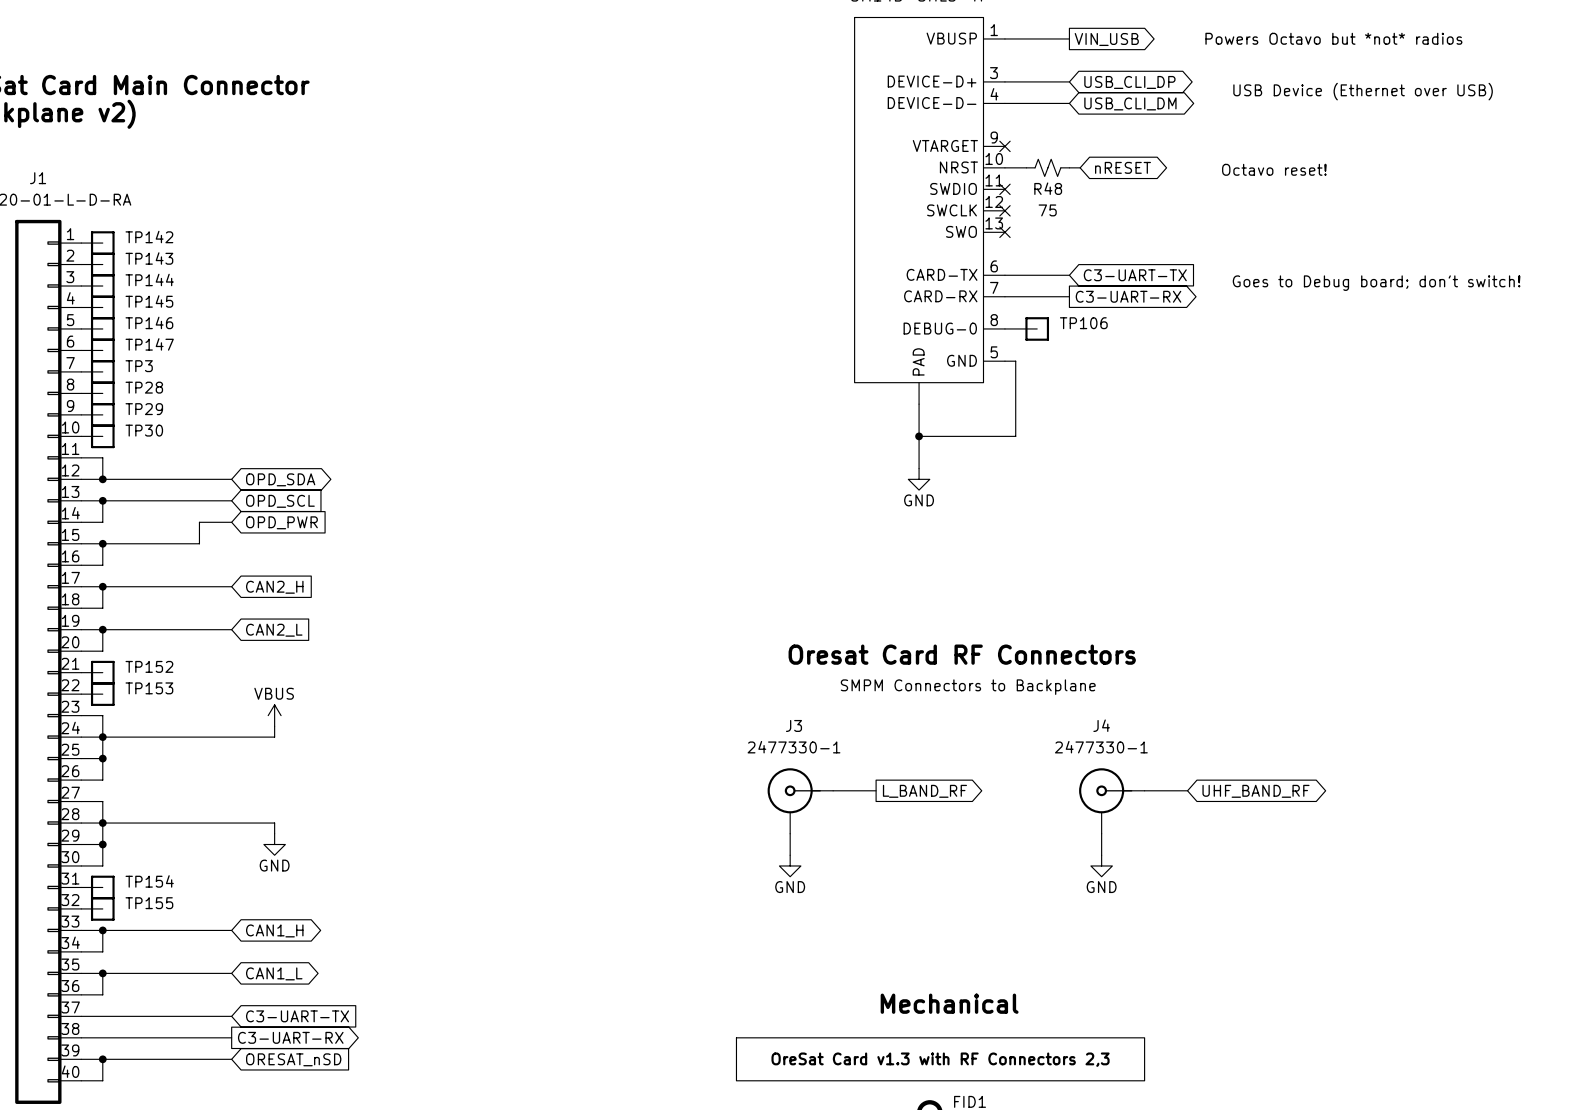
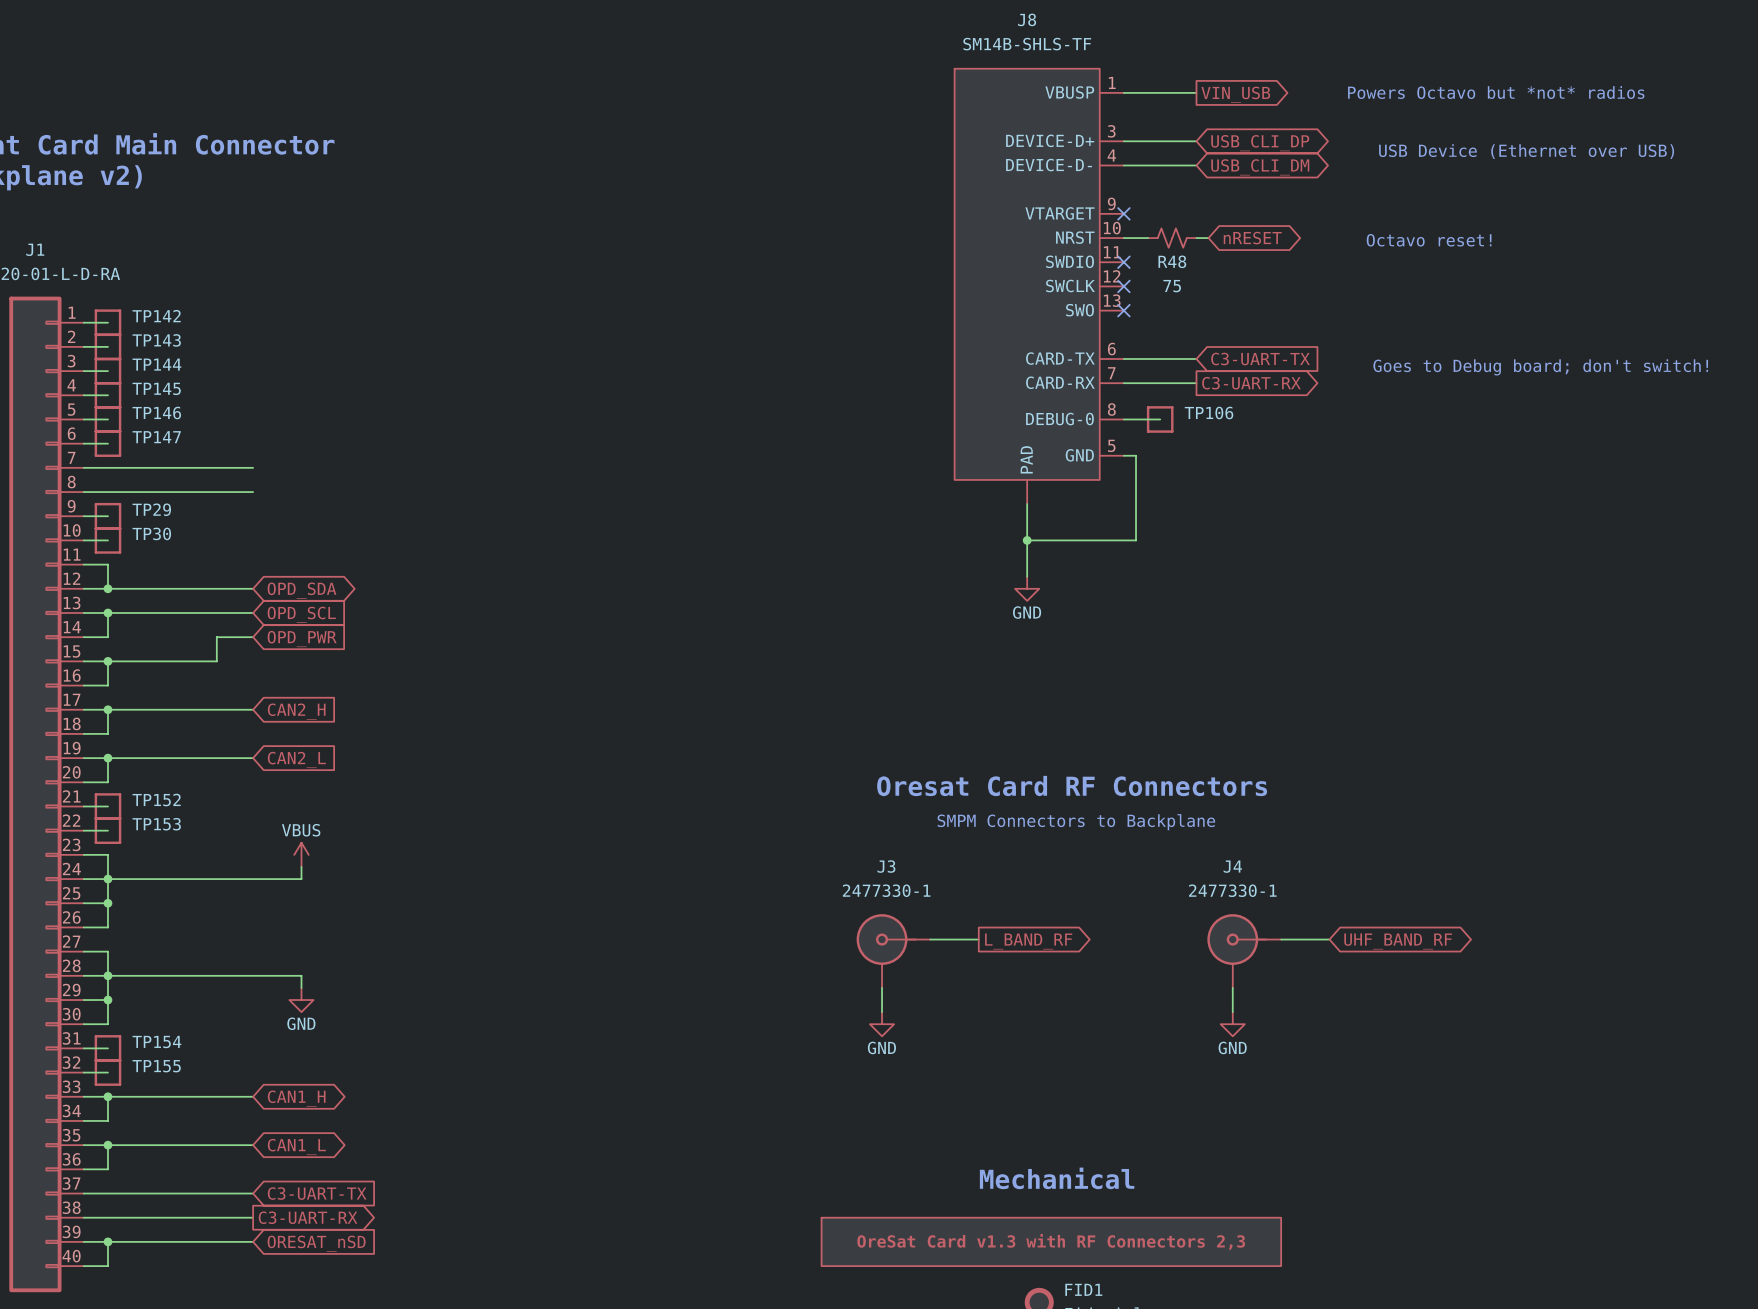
wire: none -> (107, 467) (253, 467)
TP3: (102, 371) -> none
wire: none -> (107, 492) (253, 492)
TP28: (102, 393) -> none

